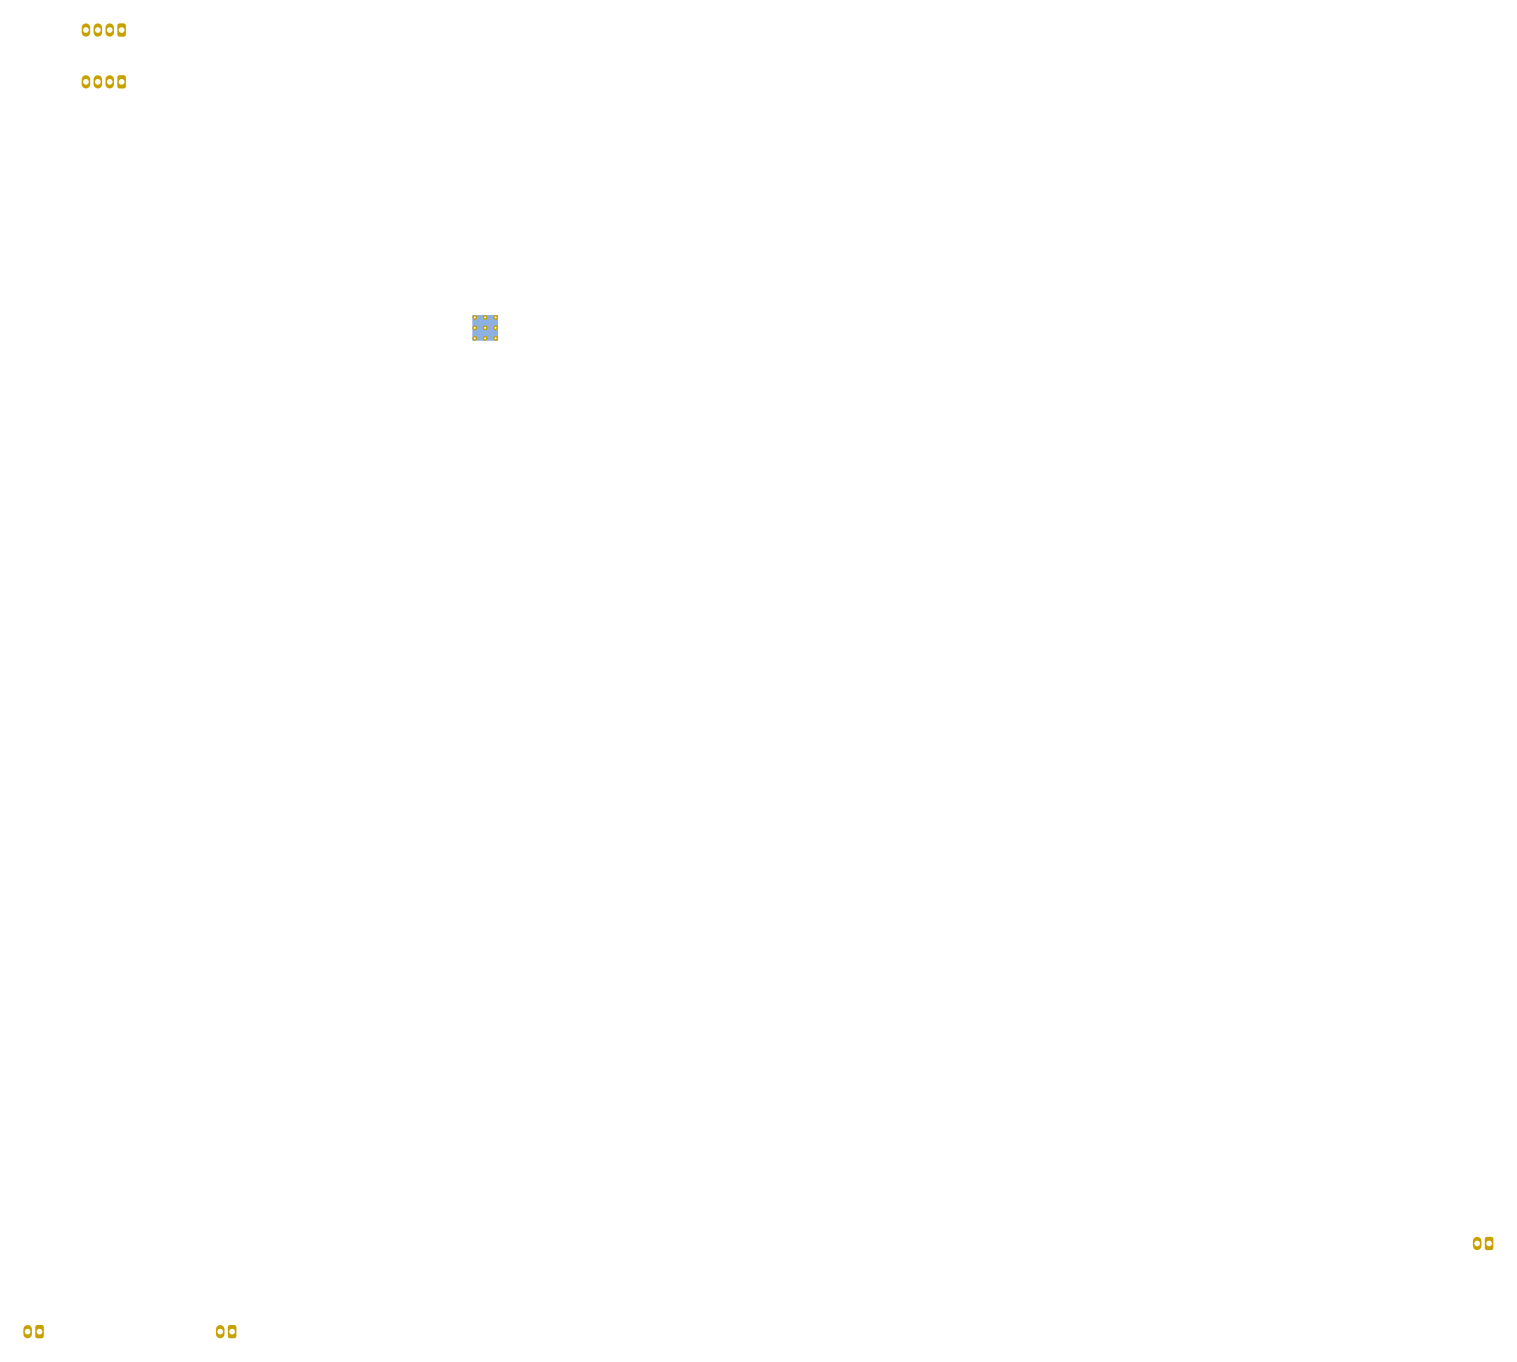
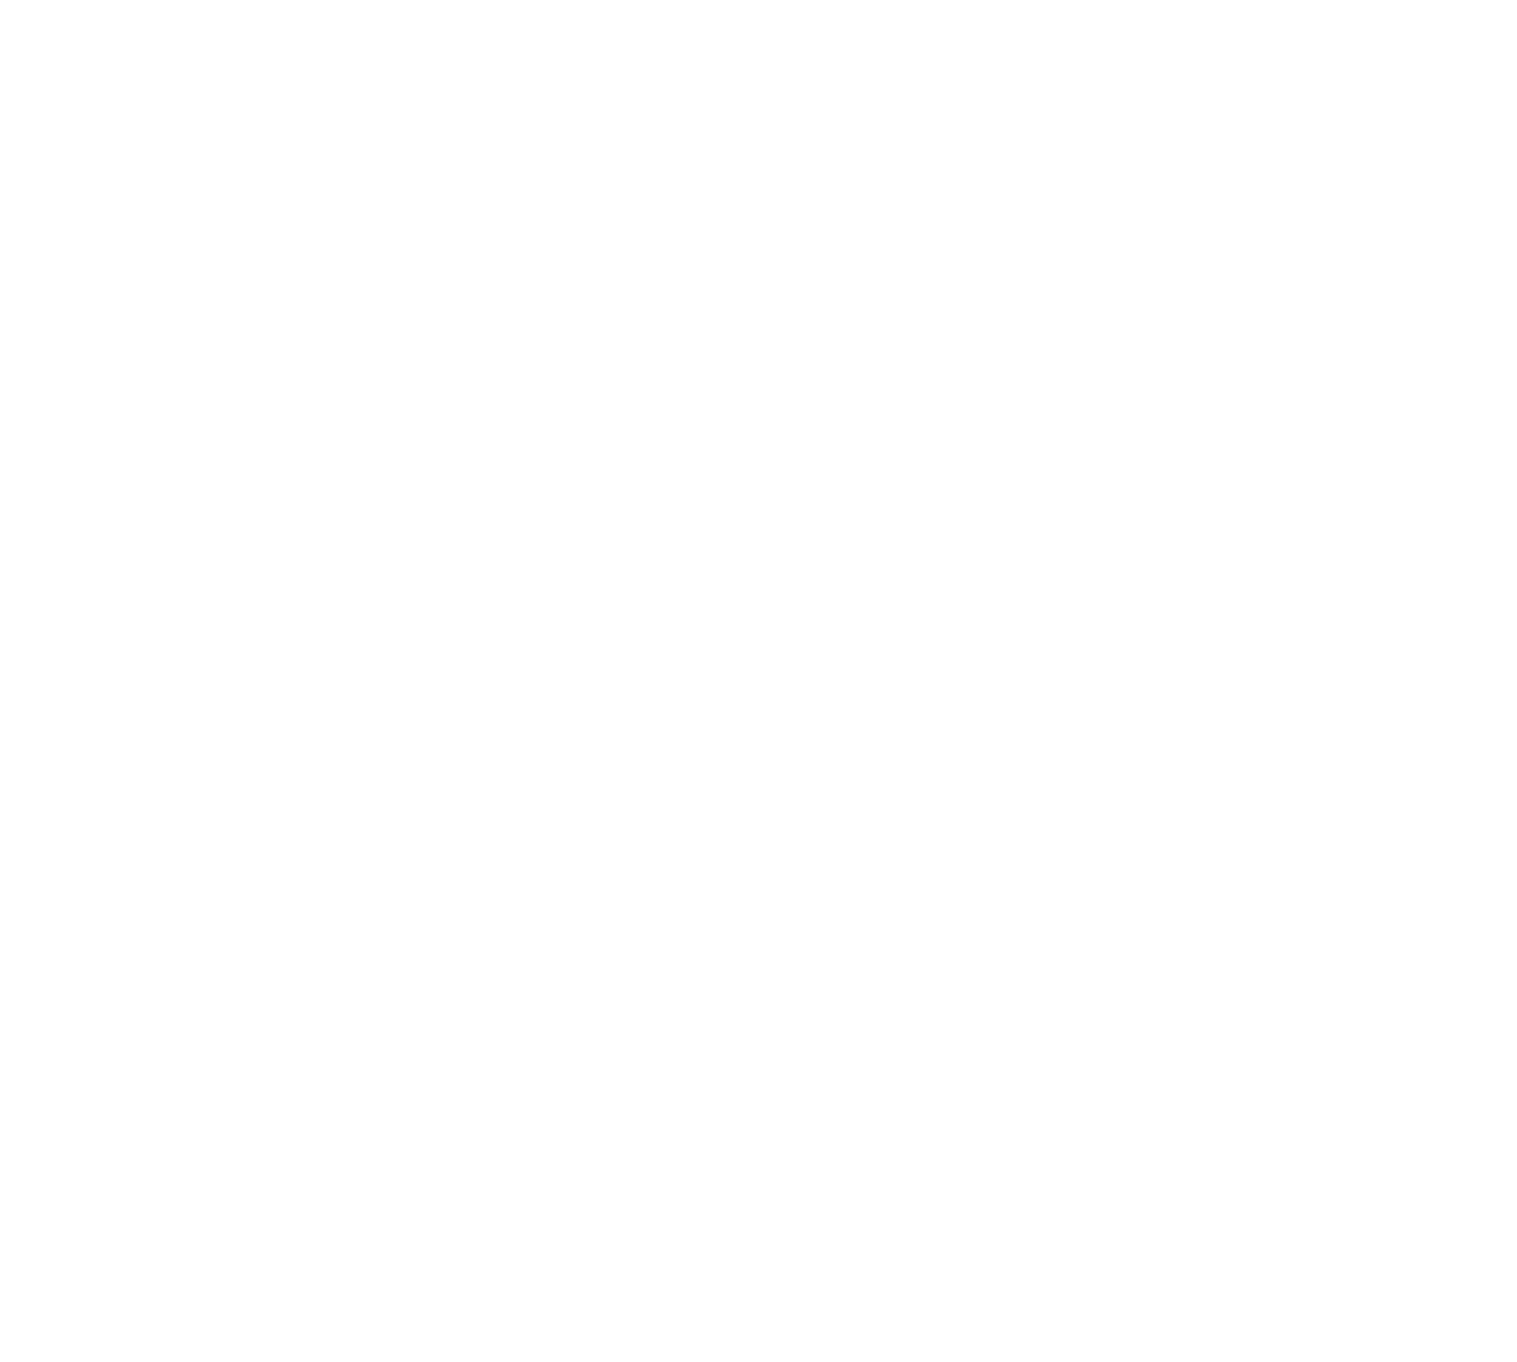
part: (103, 30) -> none
part: (103, 81) -> none
part: (485, 327) -> none
part: (1483, 1243) -> none
part: (33, 1331) -> none
part: (226, 1331) -> none

